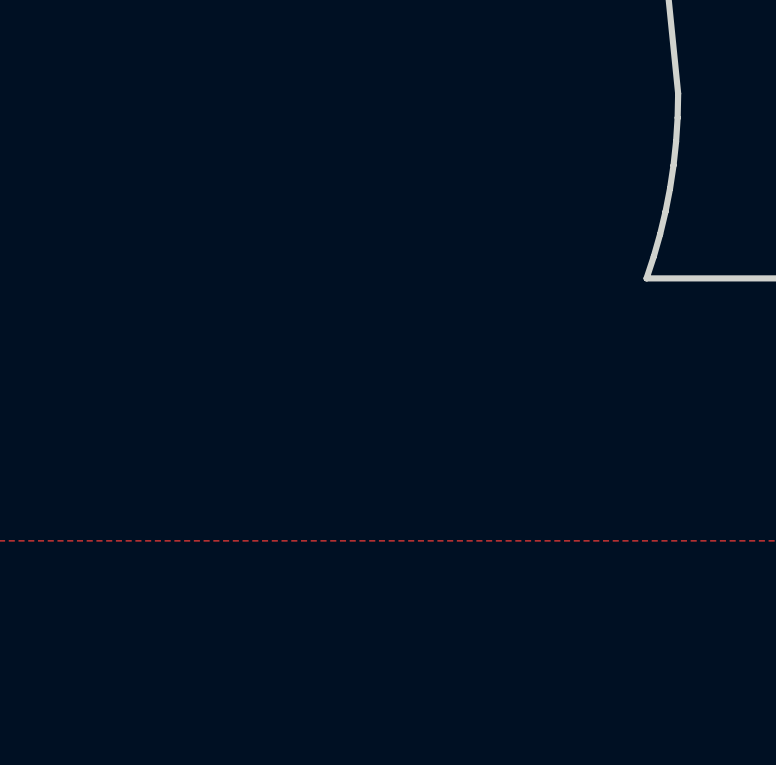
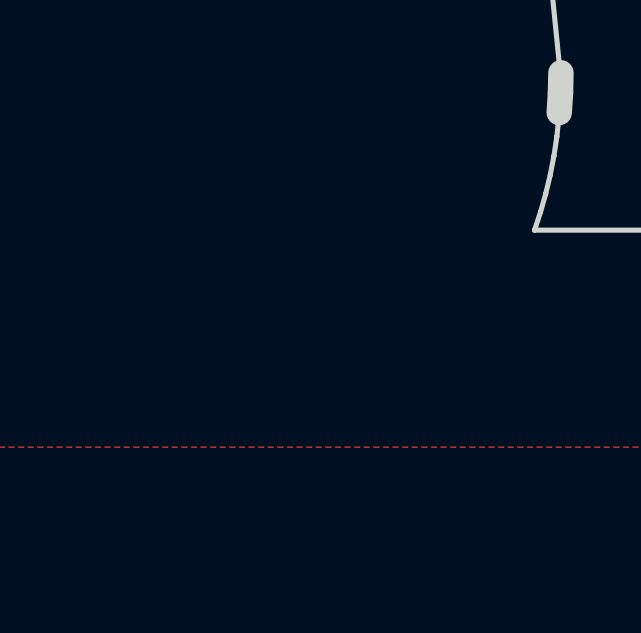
board edge width: thin (678, 93) (676, 141) -> thick (560, 77) (558, 117)

